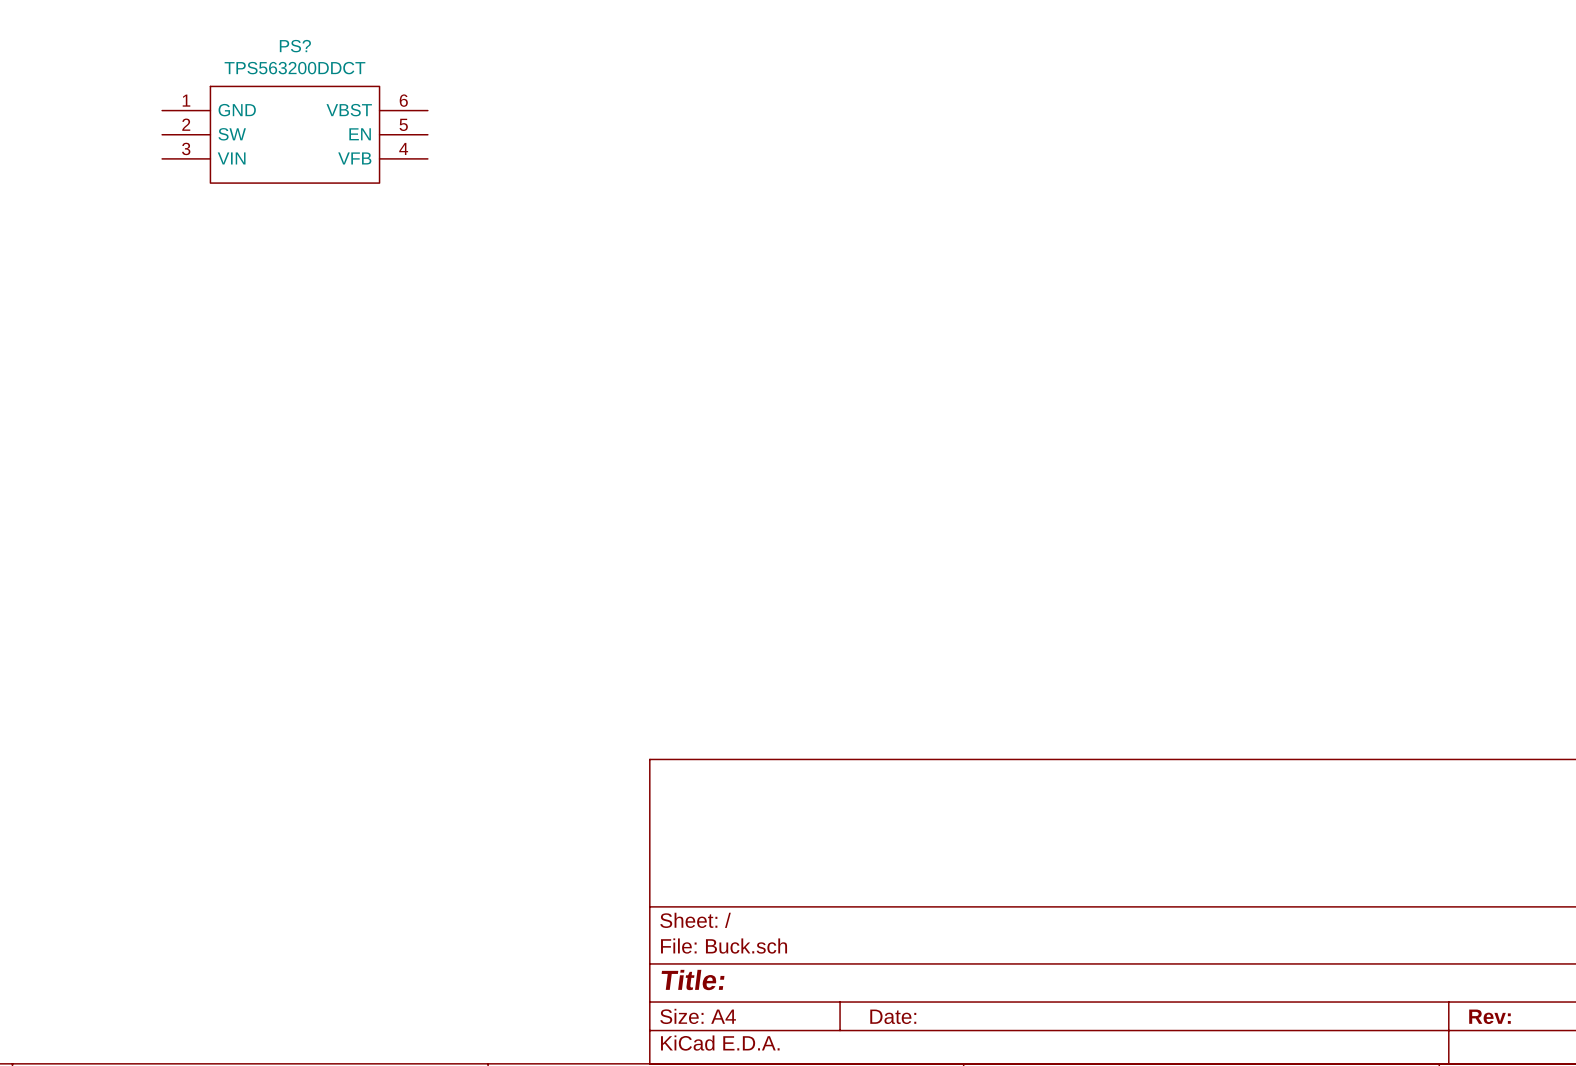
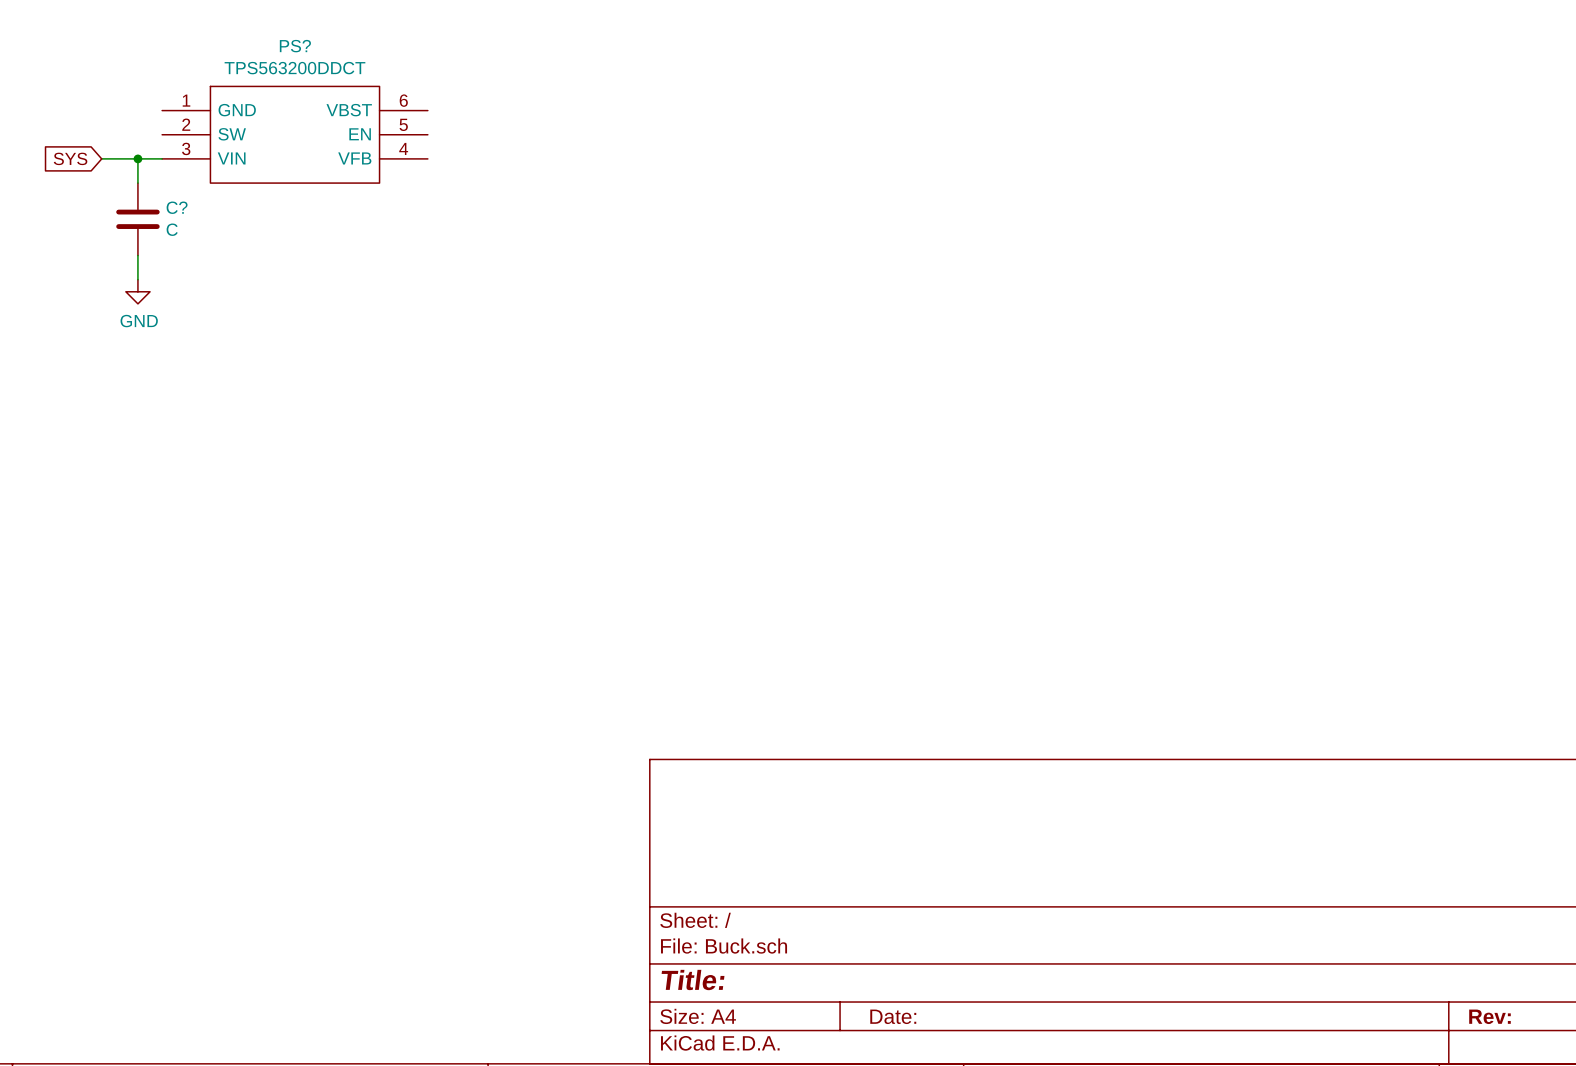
global label: none -> SYS (70, 158)
wire: none -> (101, 158) (162, 158)
wire: none -> (137, 158) (137, 183)
junction: none -> (137, 158)
C?: none -> C (137, 219)
wire: none -> (137, 255) (137, 279)
power symbol: none -> GND (137, 291)

